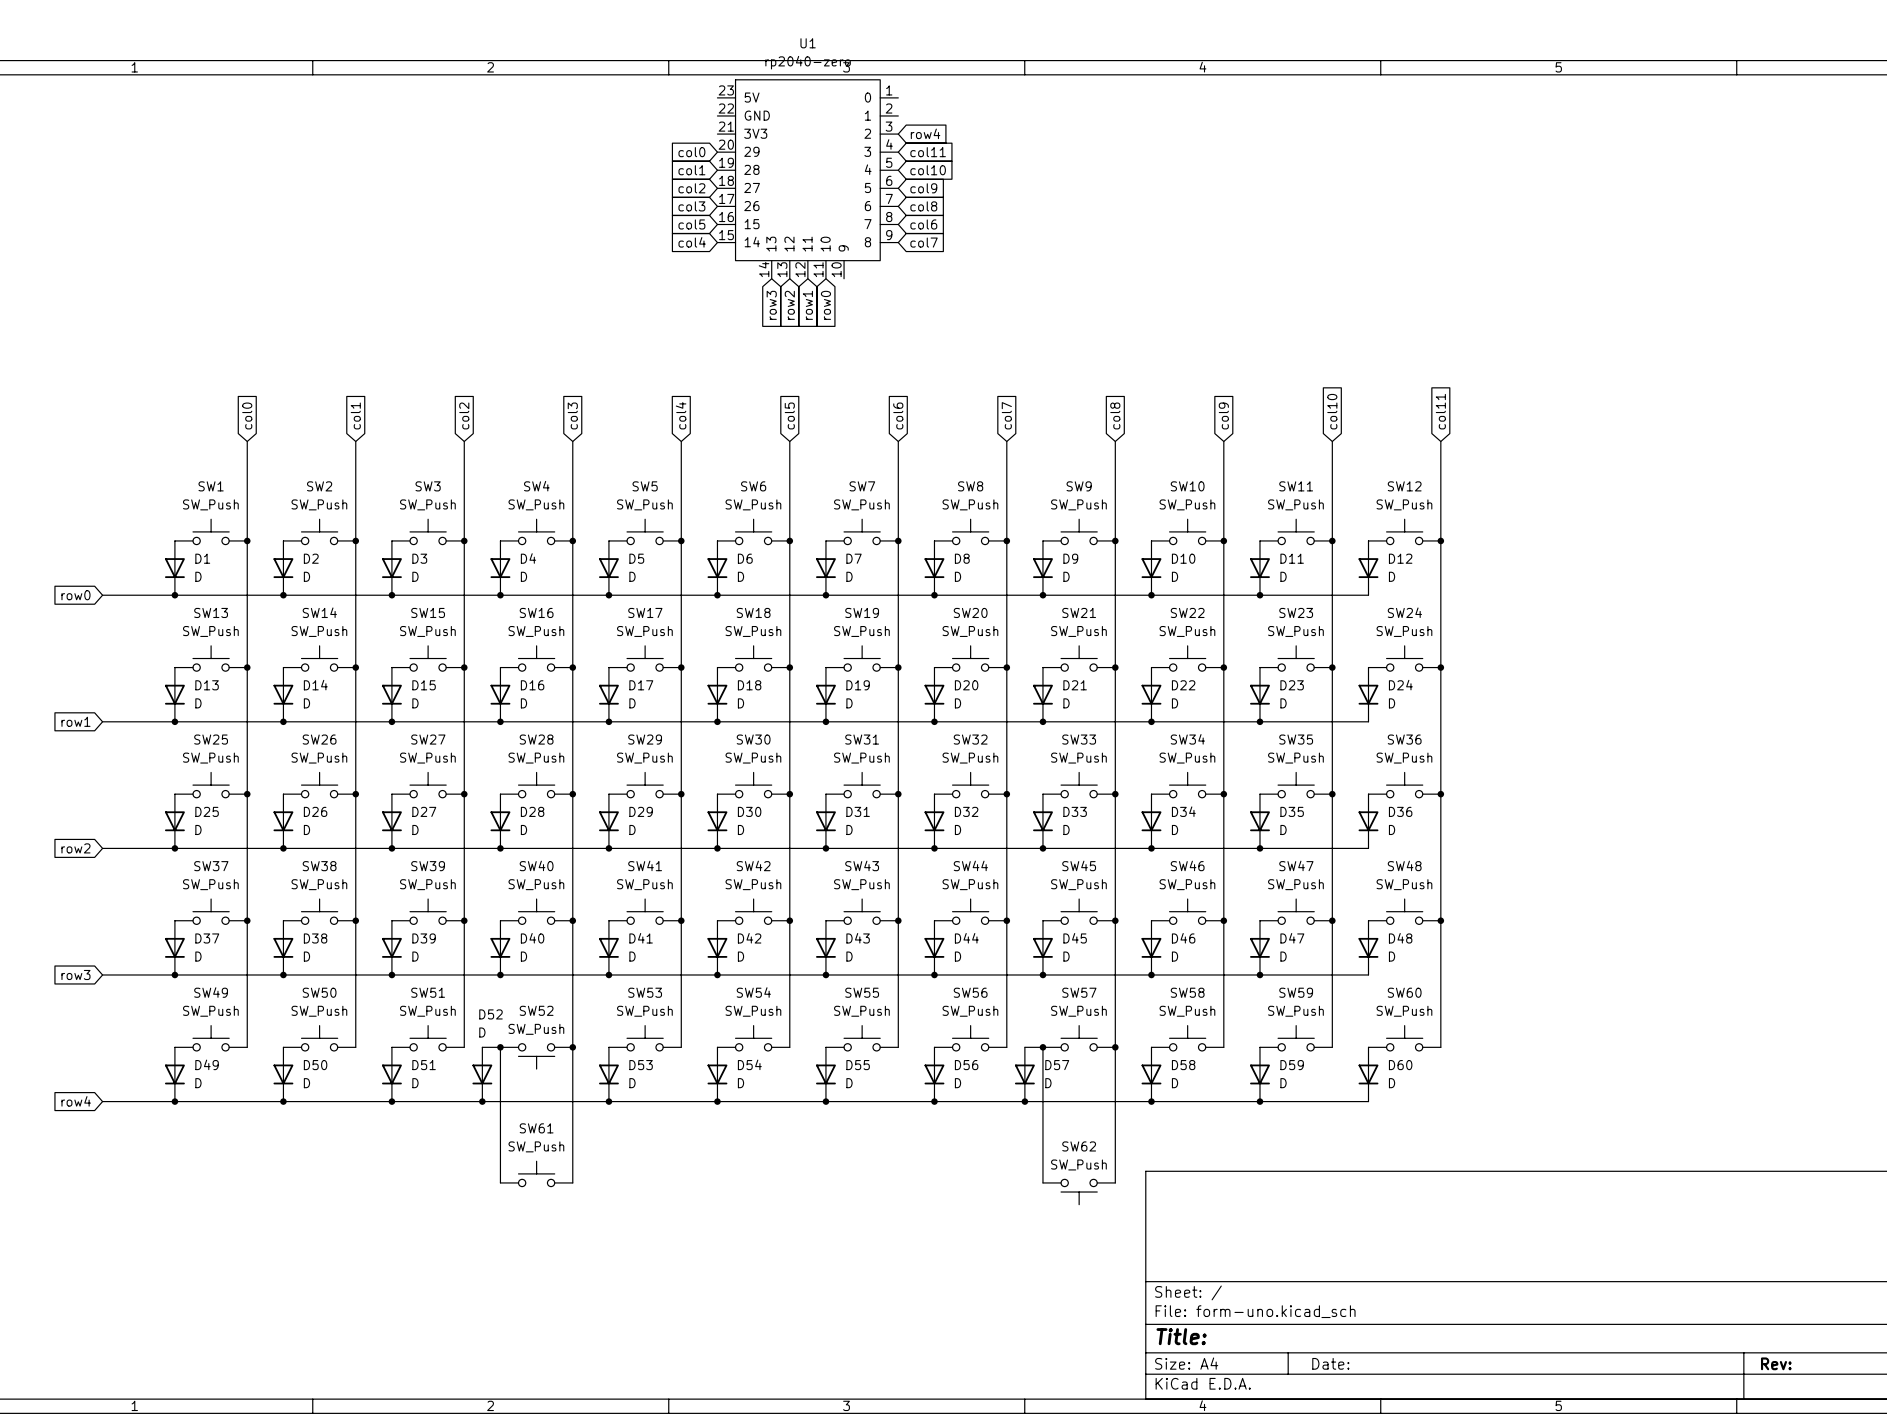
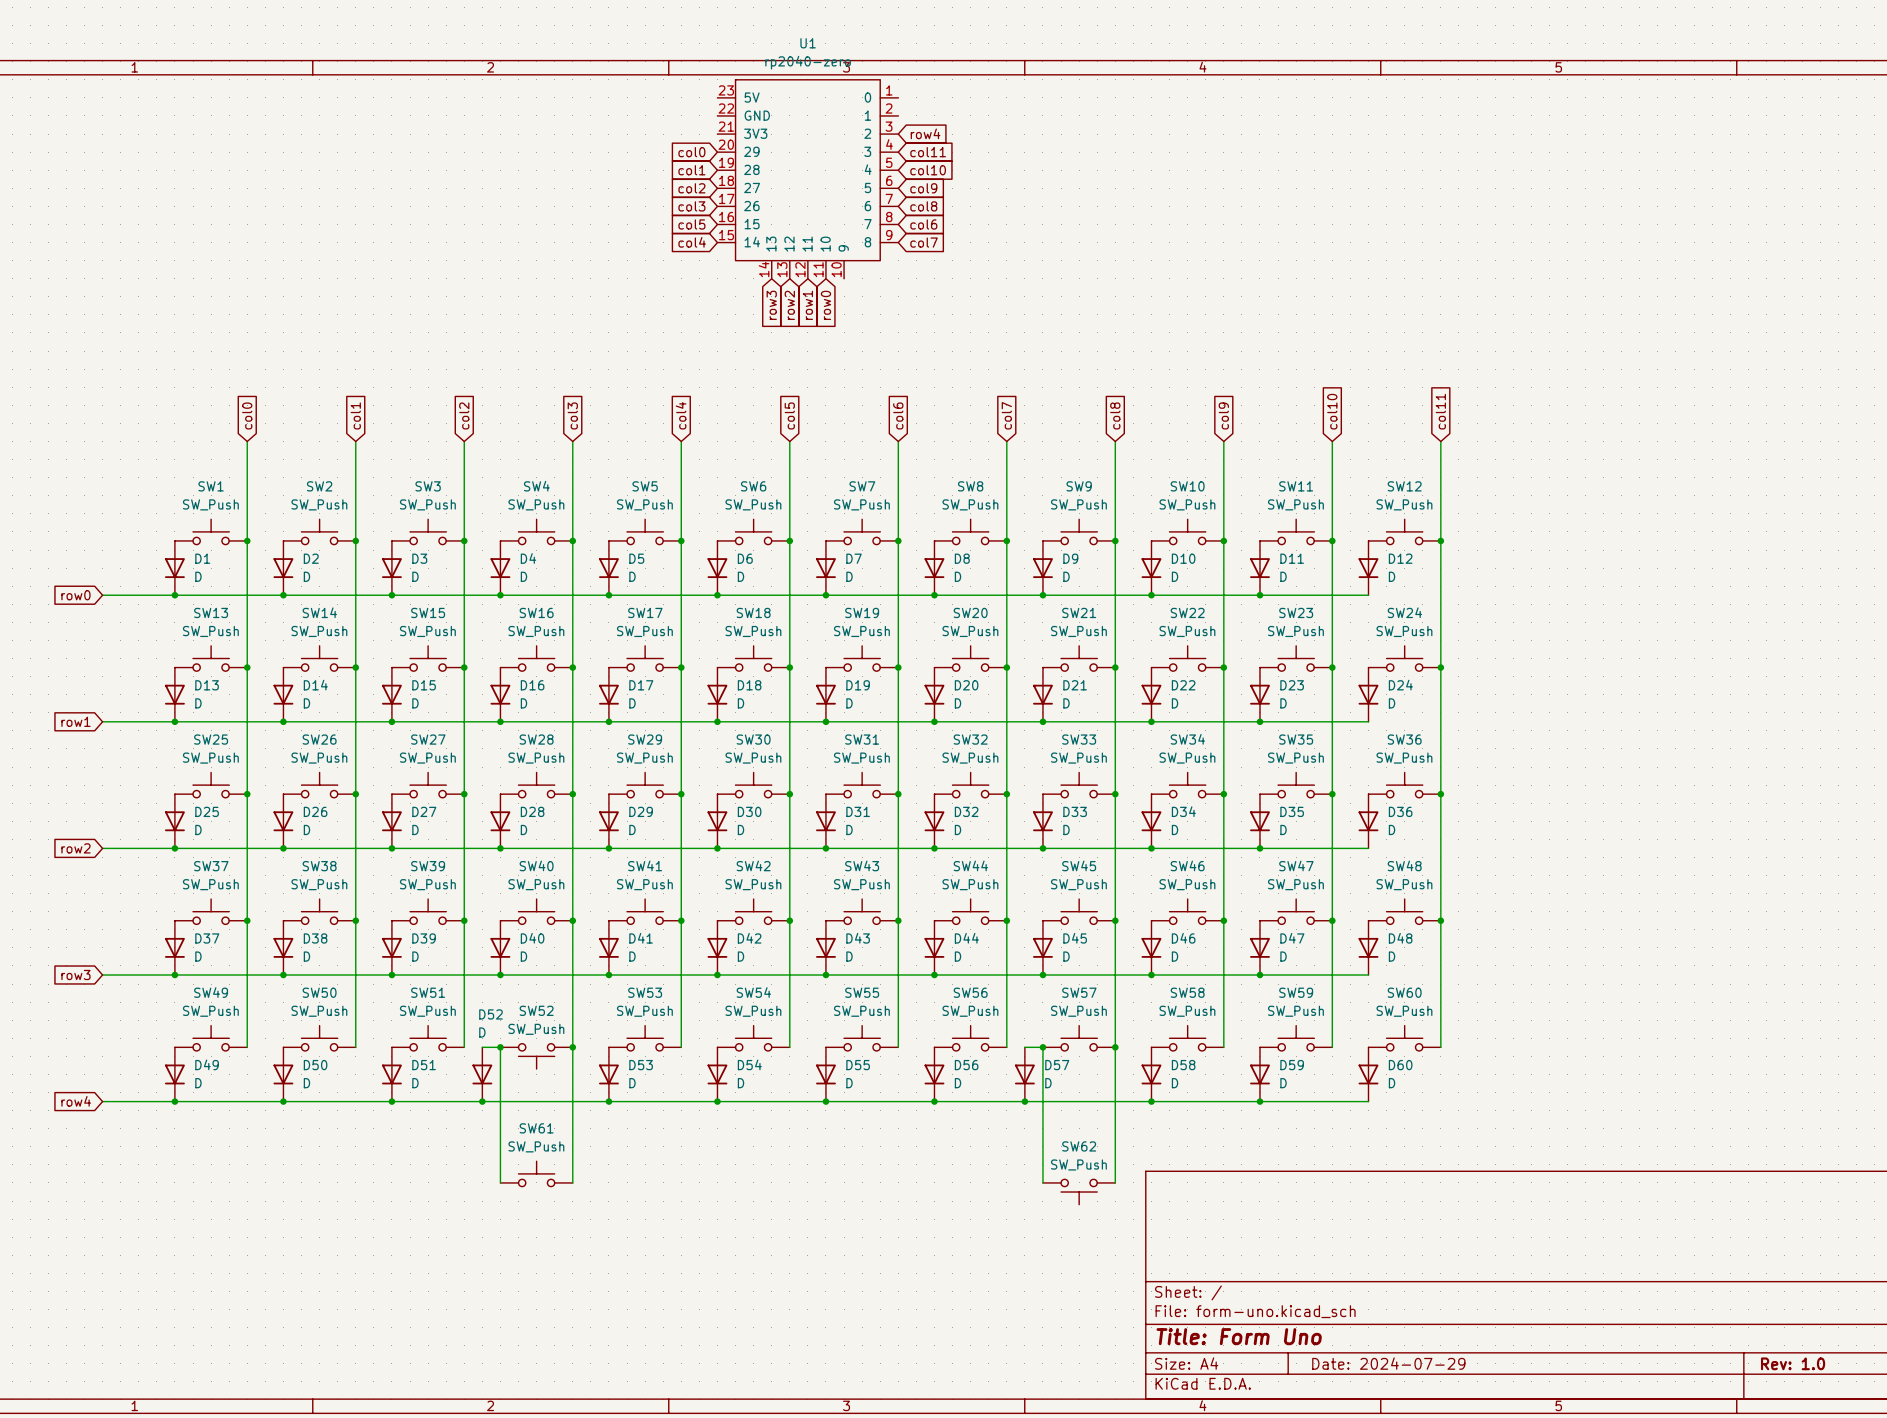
title block: Title: (1181, 1336) -> Title: Form Uno (1239, 1336)
title block: Date: (1330, 1363) -> Date: 2024-07-29 (1388, 1363)
title block: Rev: (1776, 1363) -> Rev: 1.0 (1793, 1363)

